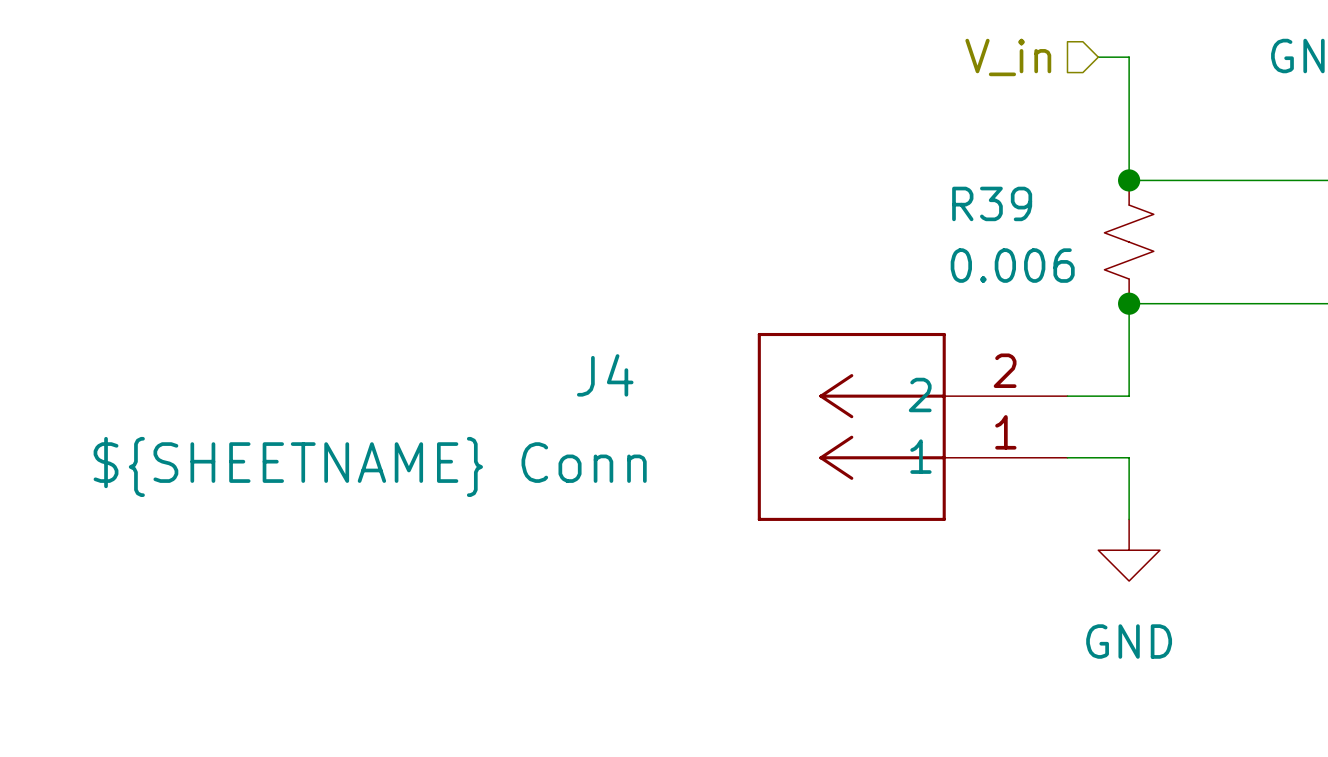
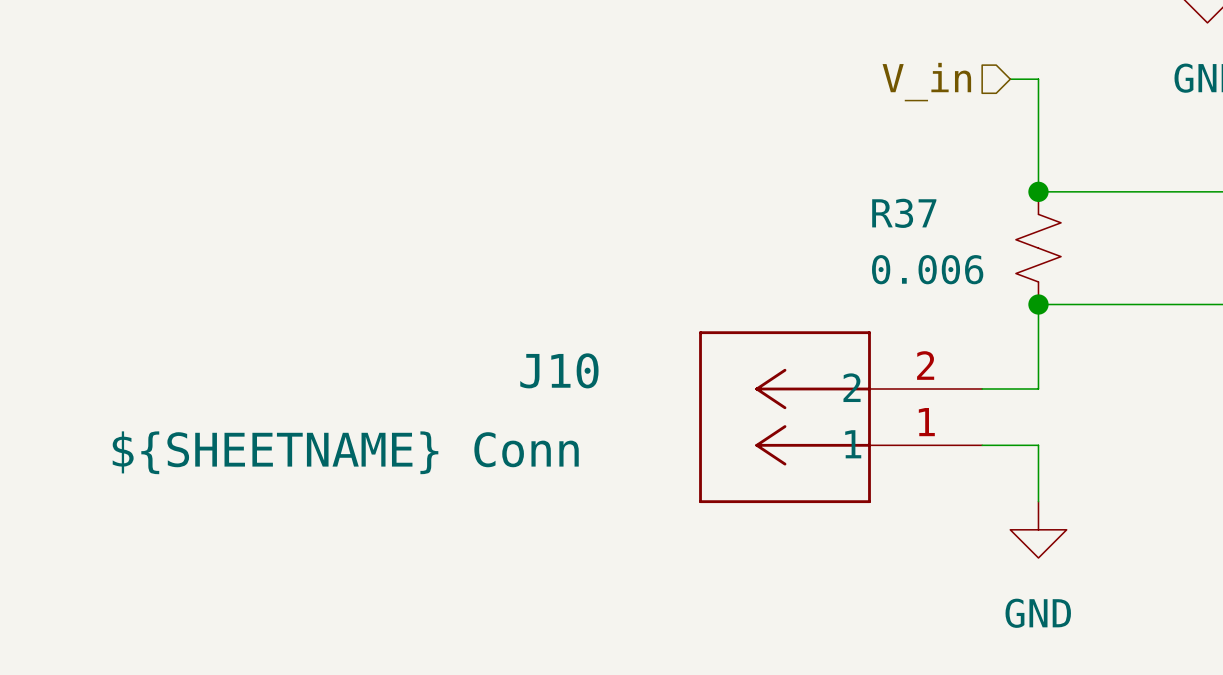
R39 name: R39 (992, 203) -> R37 (904, 213)
J4 name: J4 (605, 375) -> J10 (559, 370)

